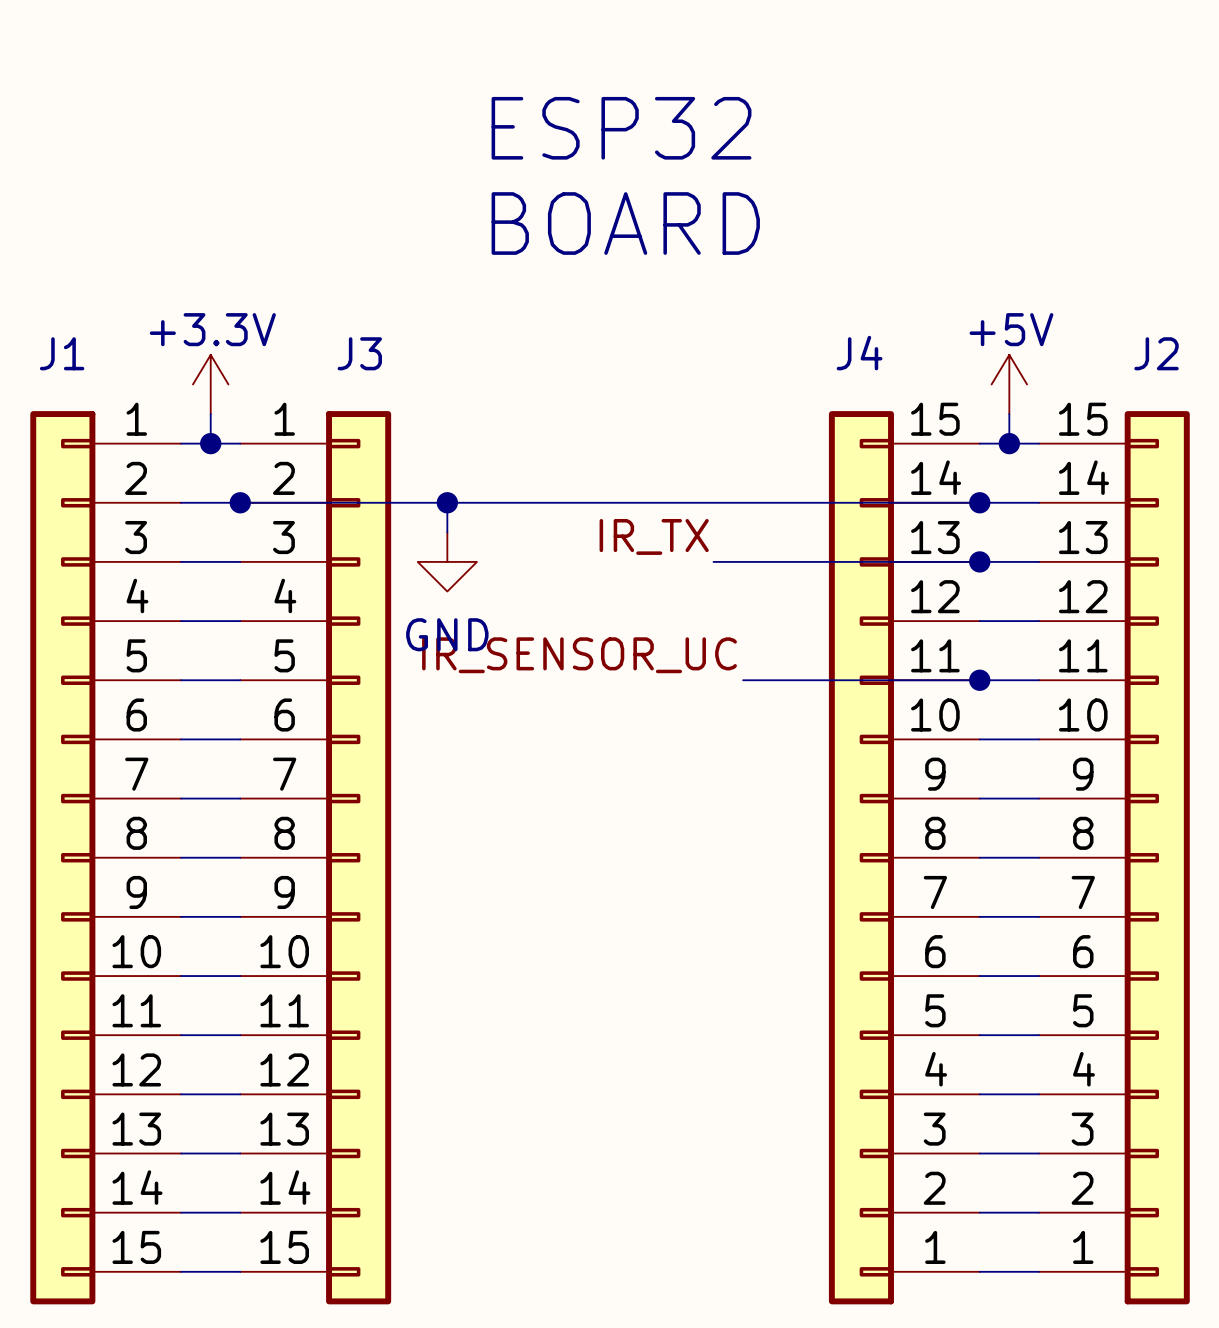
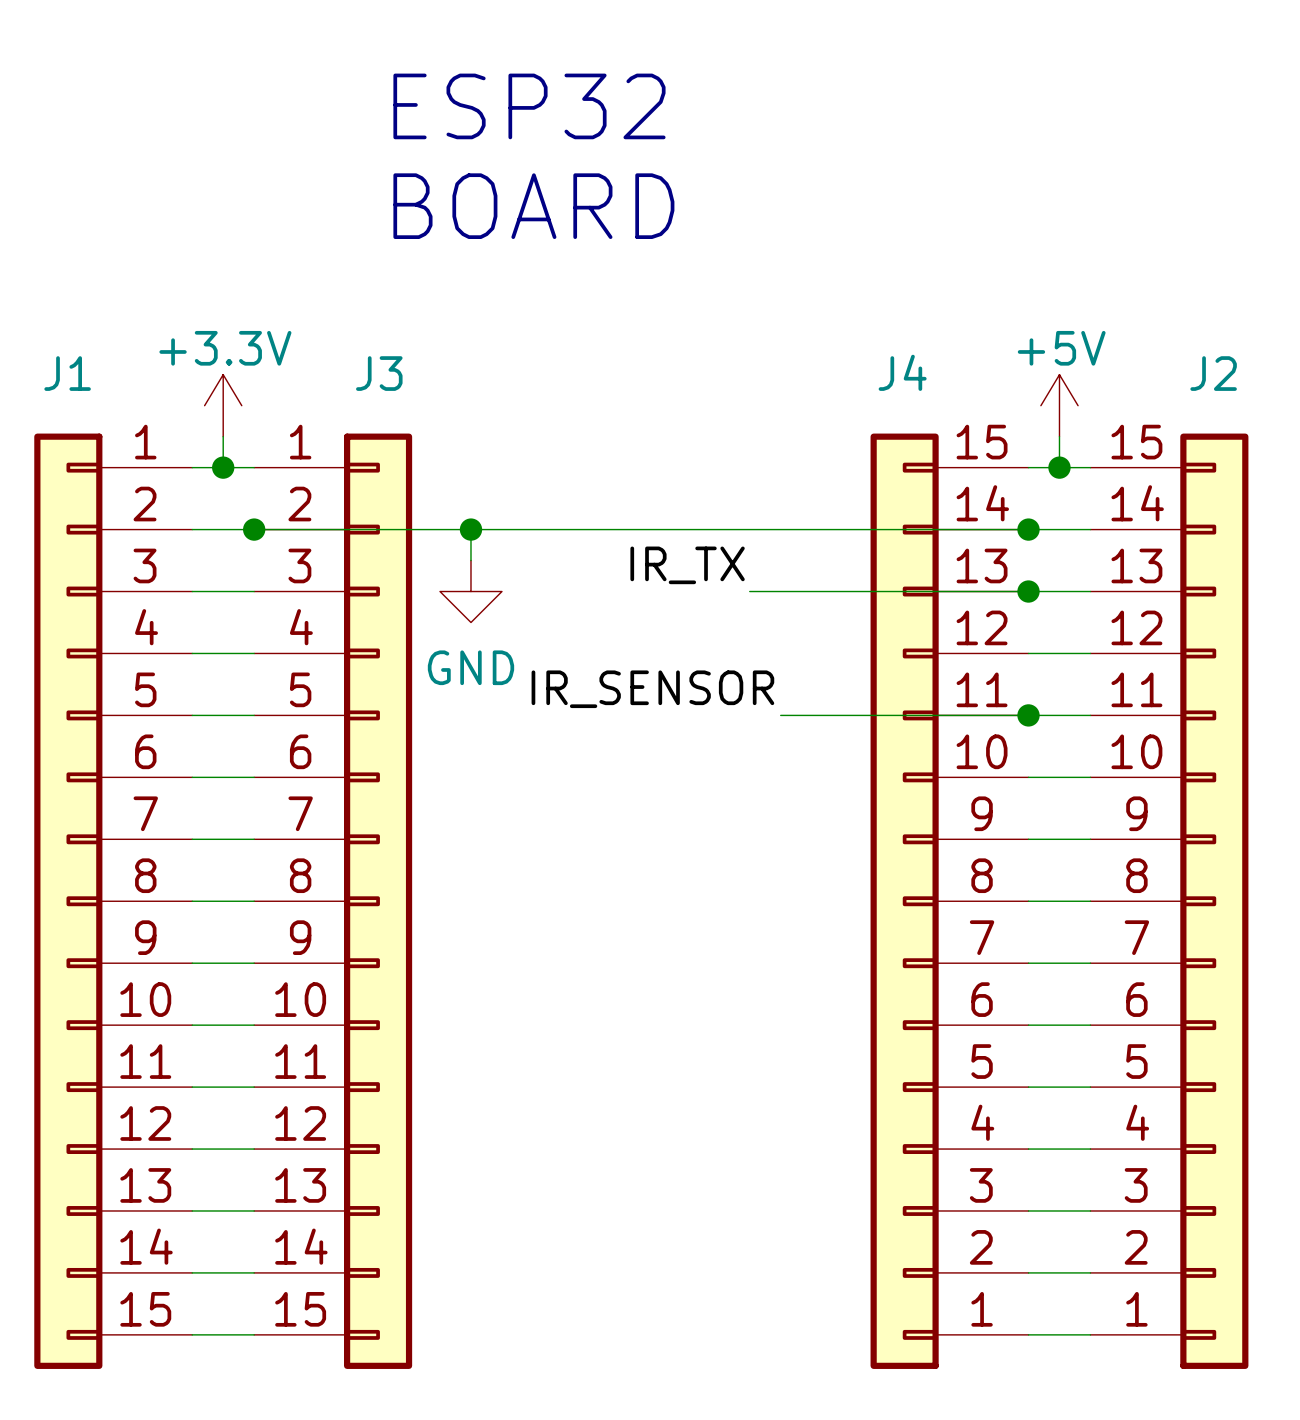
text position: ESP32 (621, 128) -> ESP32 (529, 106)
text position: BOARD (625, 223) -> BOARD (533, 206)
label: IR_SENSOR_UC (579, 655) -> IR_SENSOR (652, 689)

